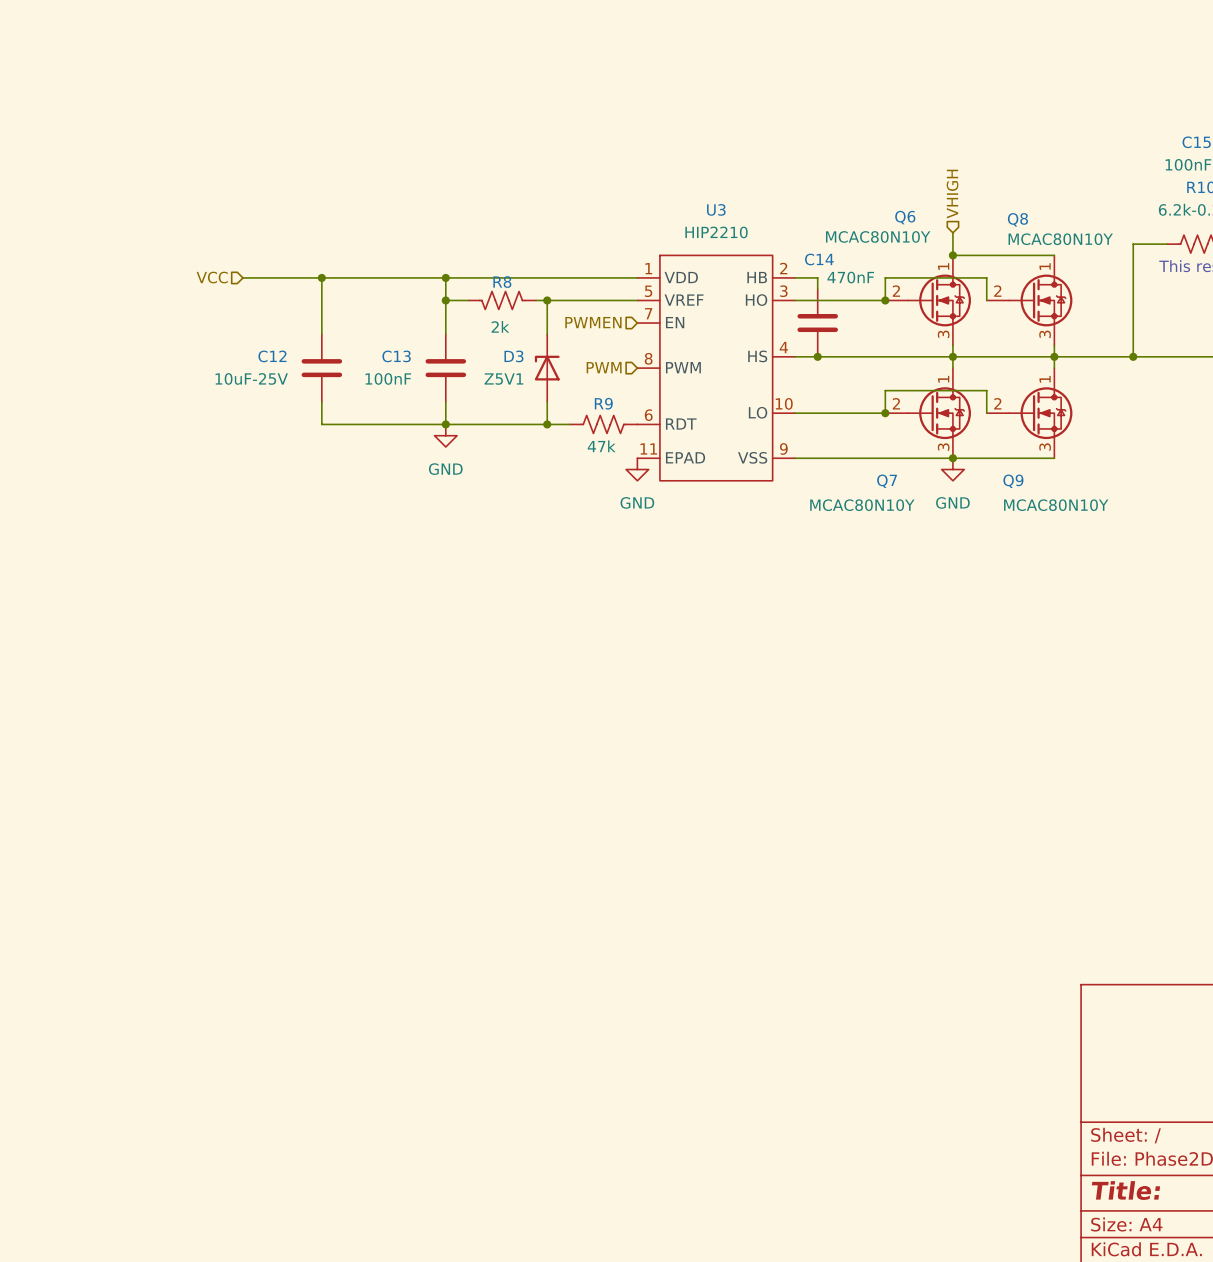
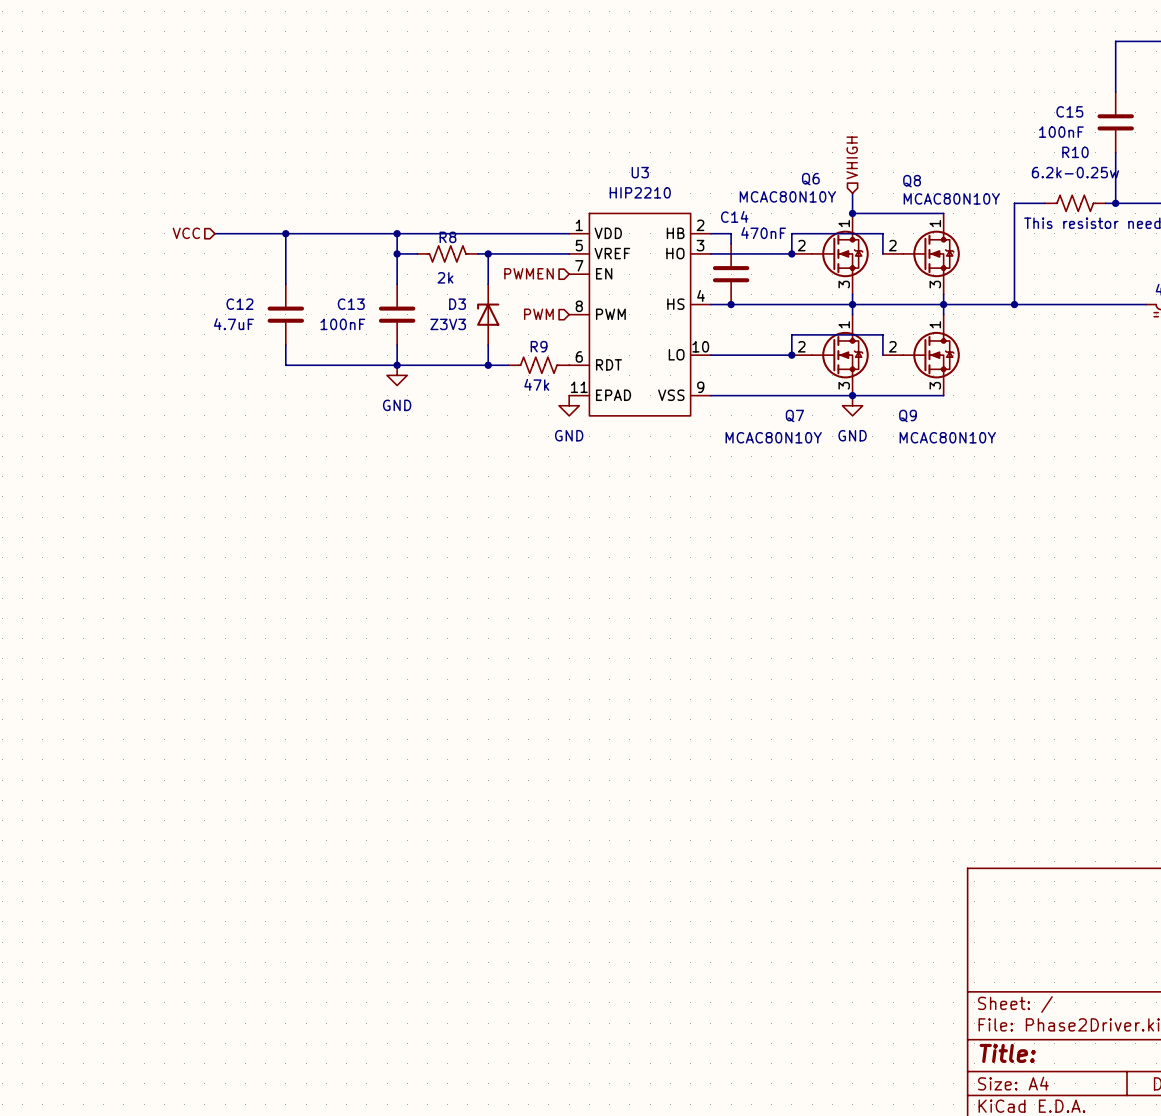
C12 value: 10uF-25V (251, 378) -> 4.7uF (233, 324)
D3 value: Z5V1 (503, 379) -> Z3V3 (448, 324)

